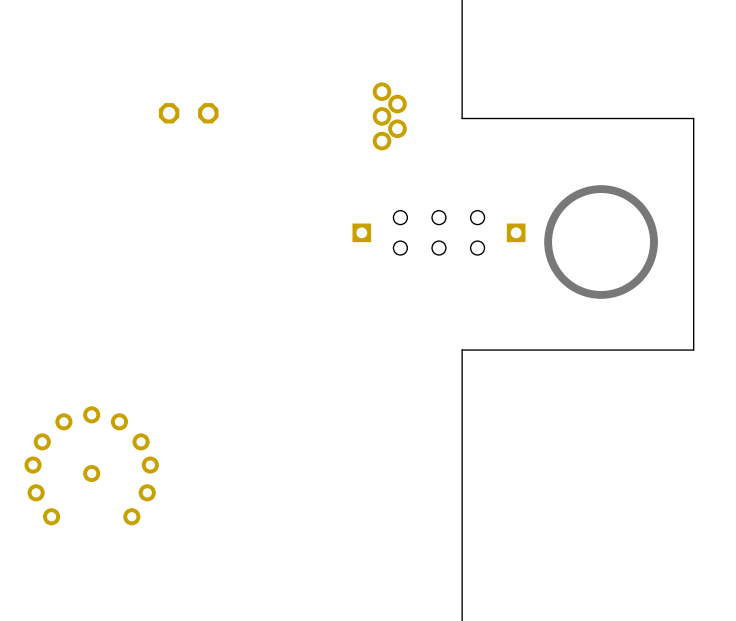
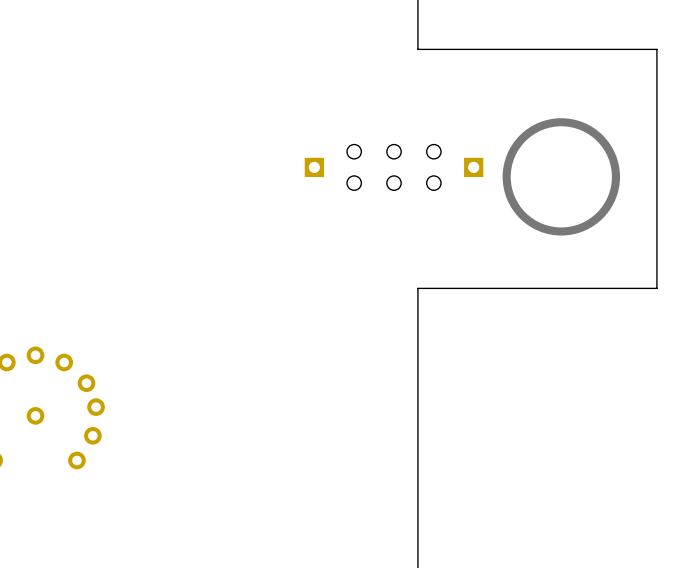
part: (188, 113) -> none
part: (389, 116) -> none

